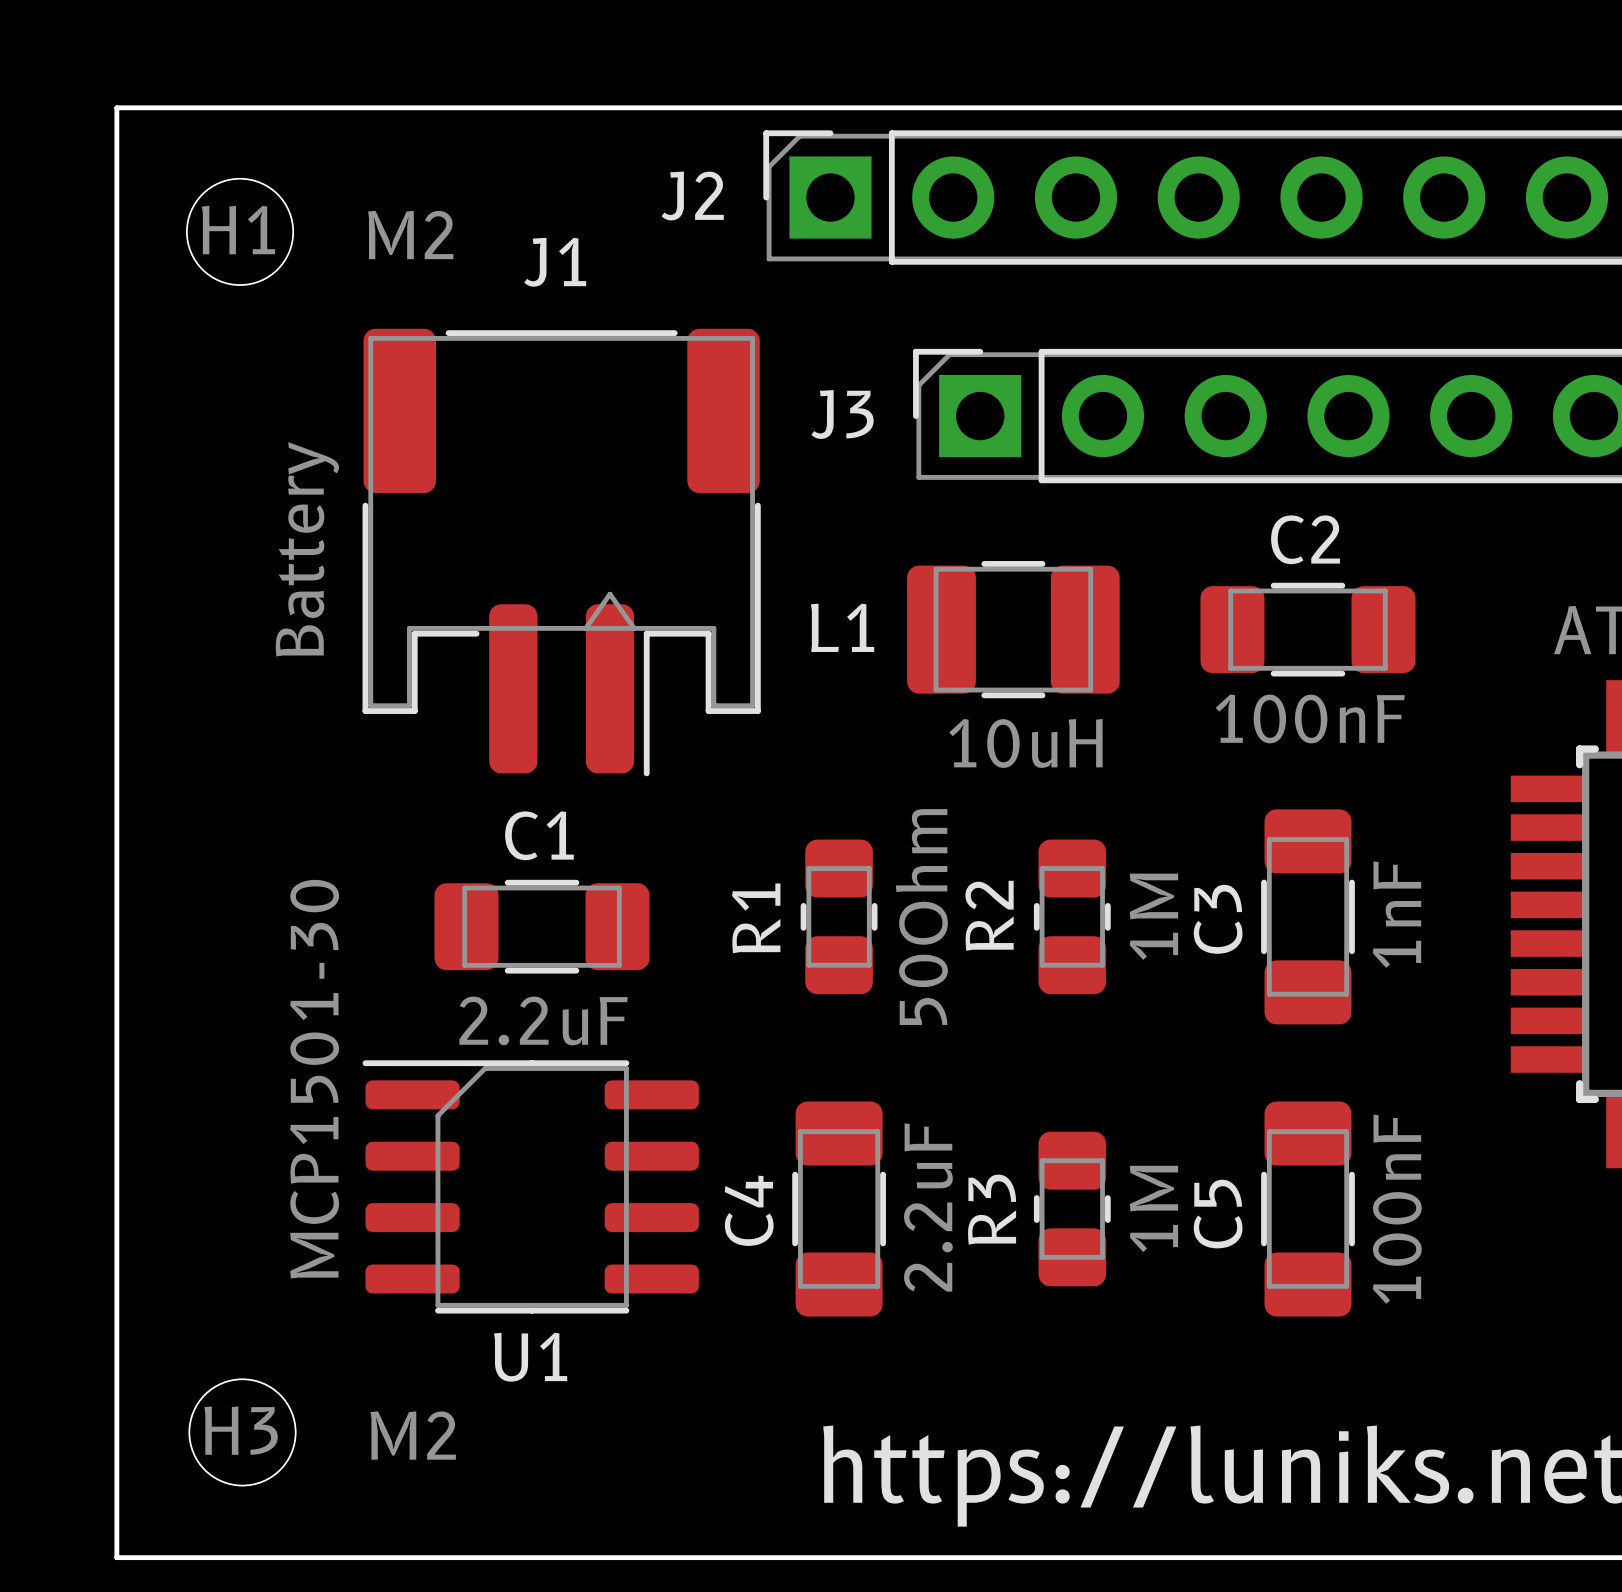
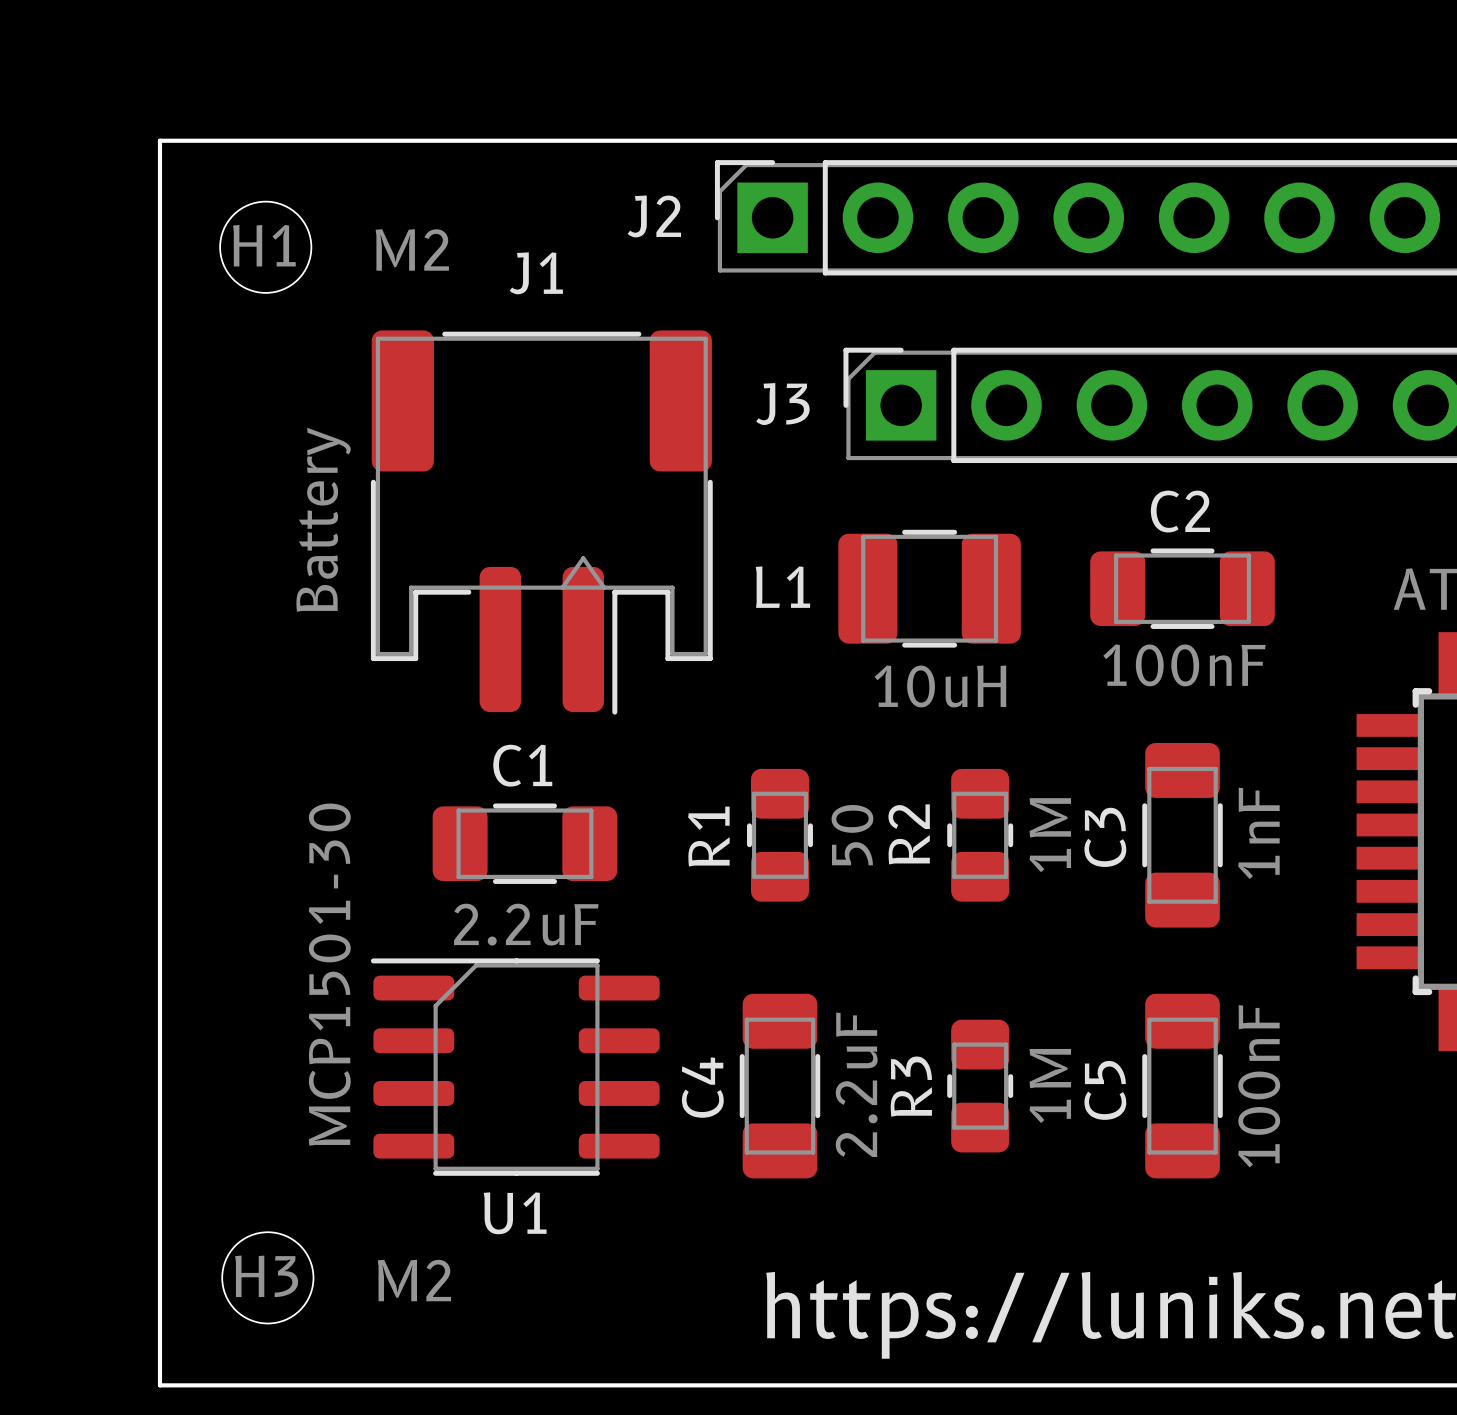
R1 value: 50Ohm (921, 917) -> 50 (852, 835)

